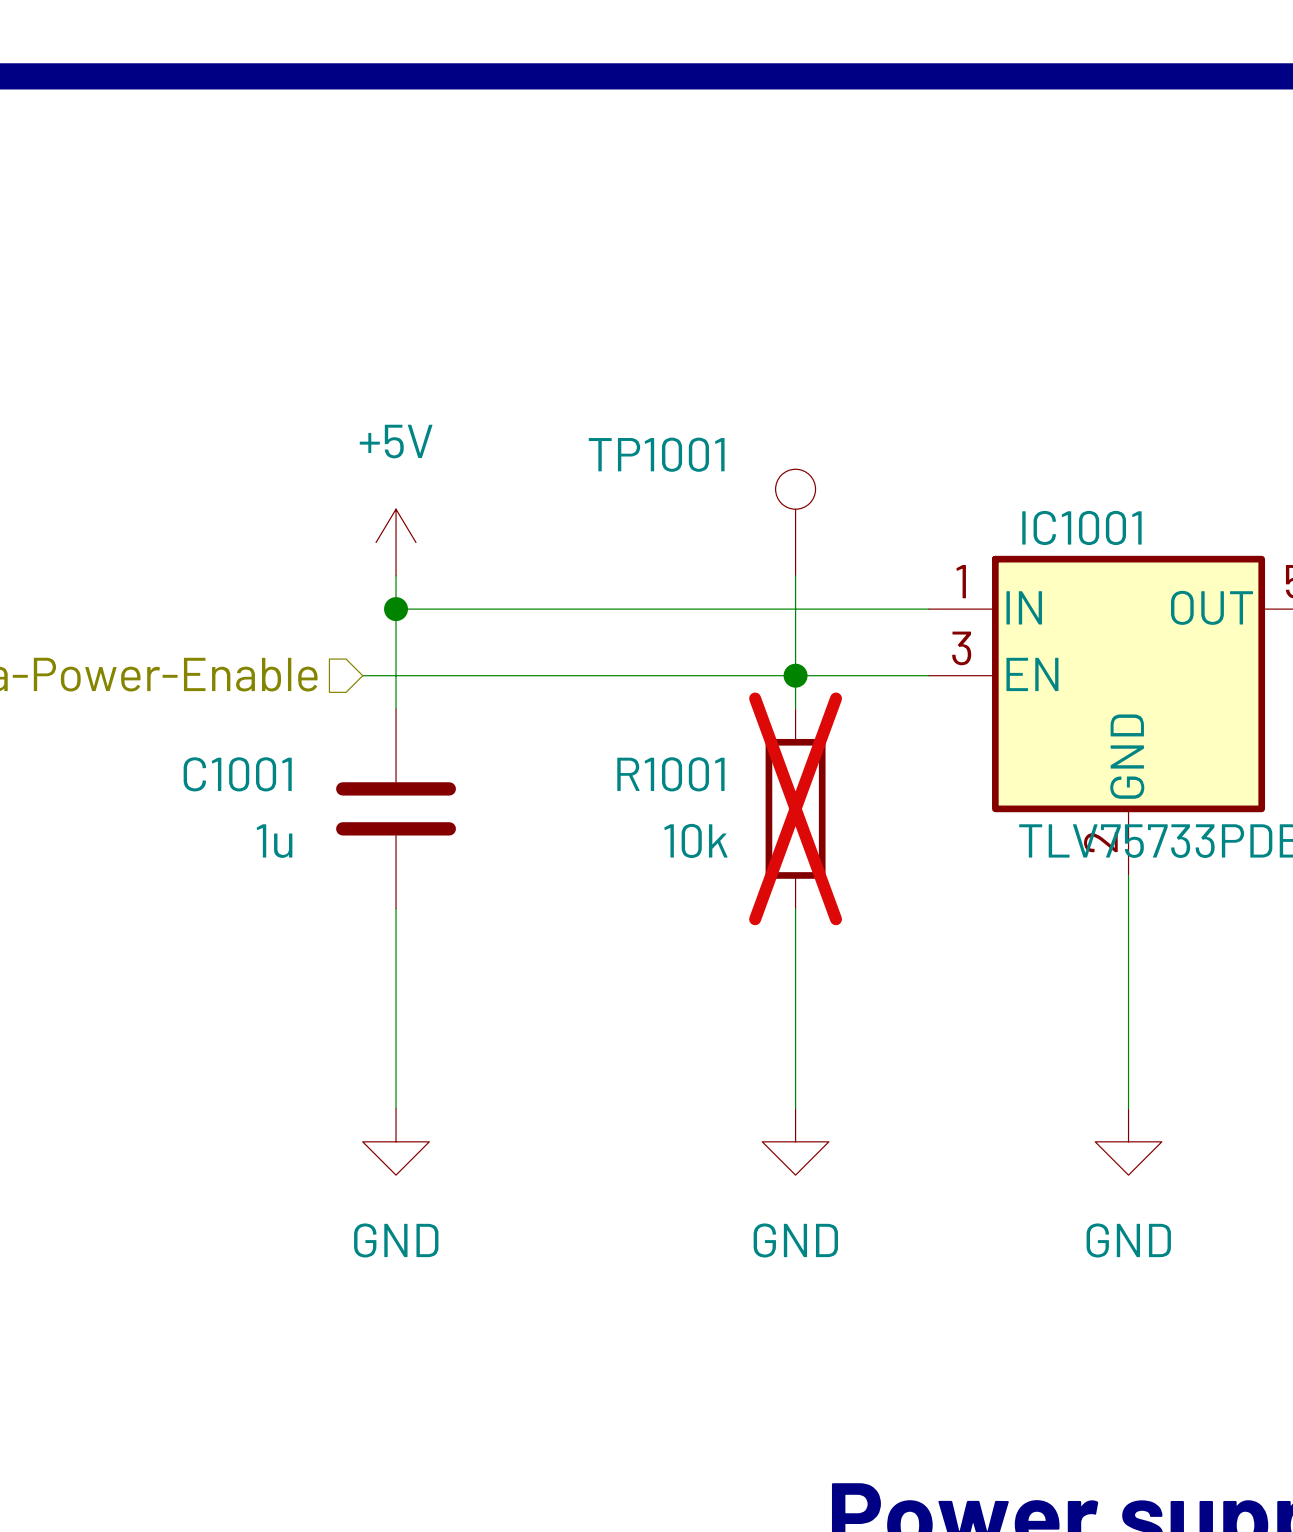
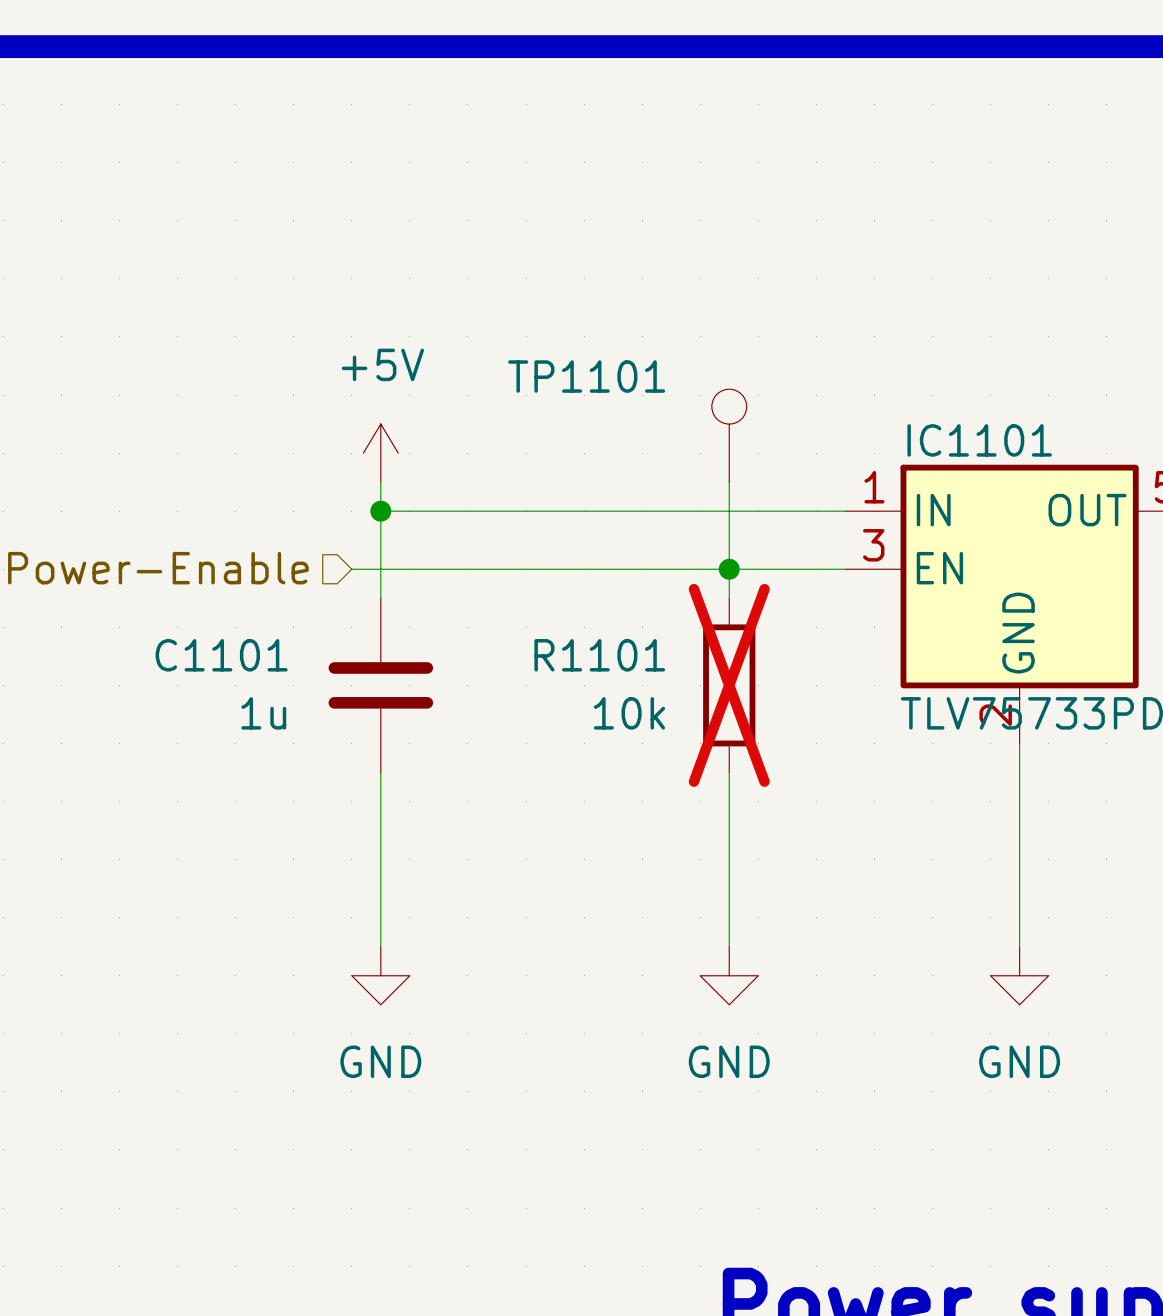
TP1001 name: TP1001 (656, 454) -> TP1101 (586, 376)
IC1001 name: IC1001 (1081, 527) -> IC1101 (979, 440)
C1001 name: C1001 (237, 774) -> C1101 (221, 655)
R1001 name: R1001 (670, 774) -> R1101 (599, 655)

